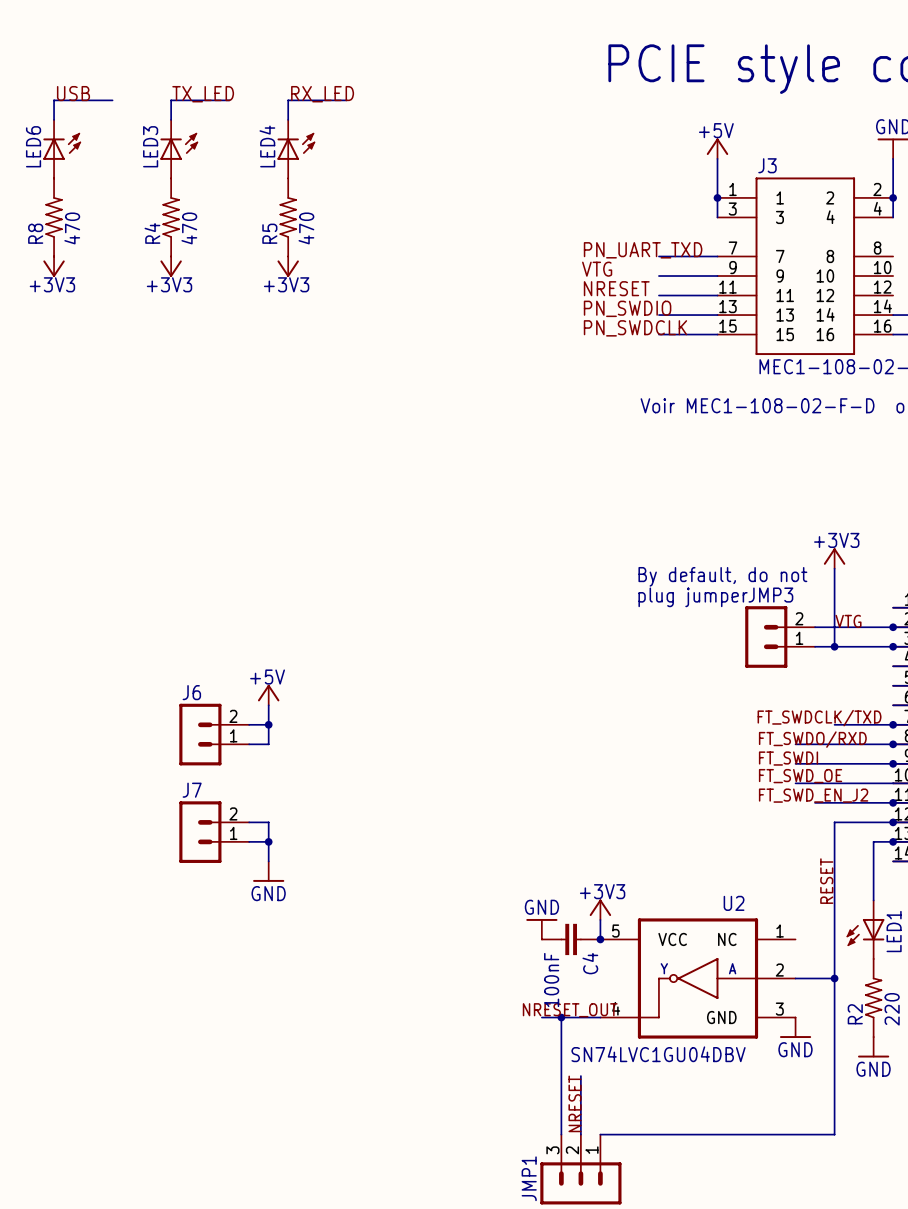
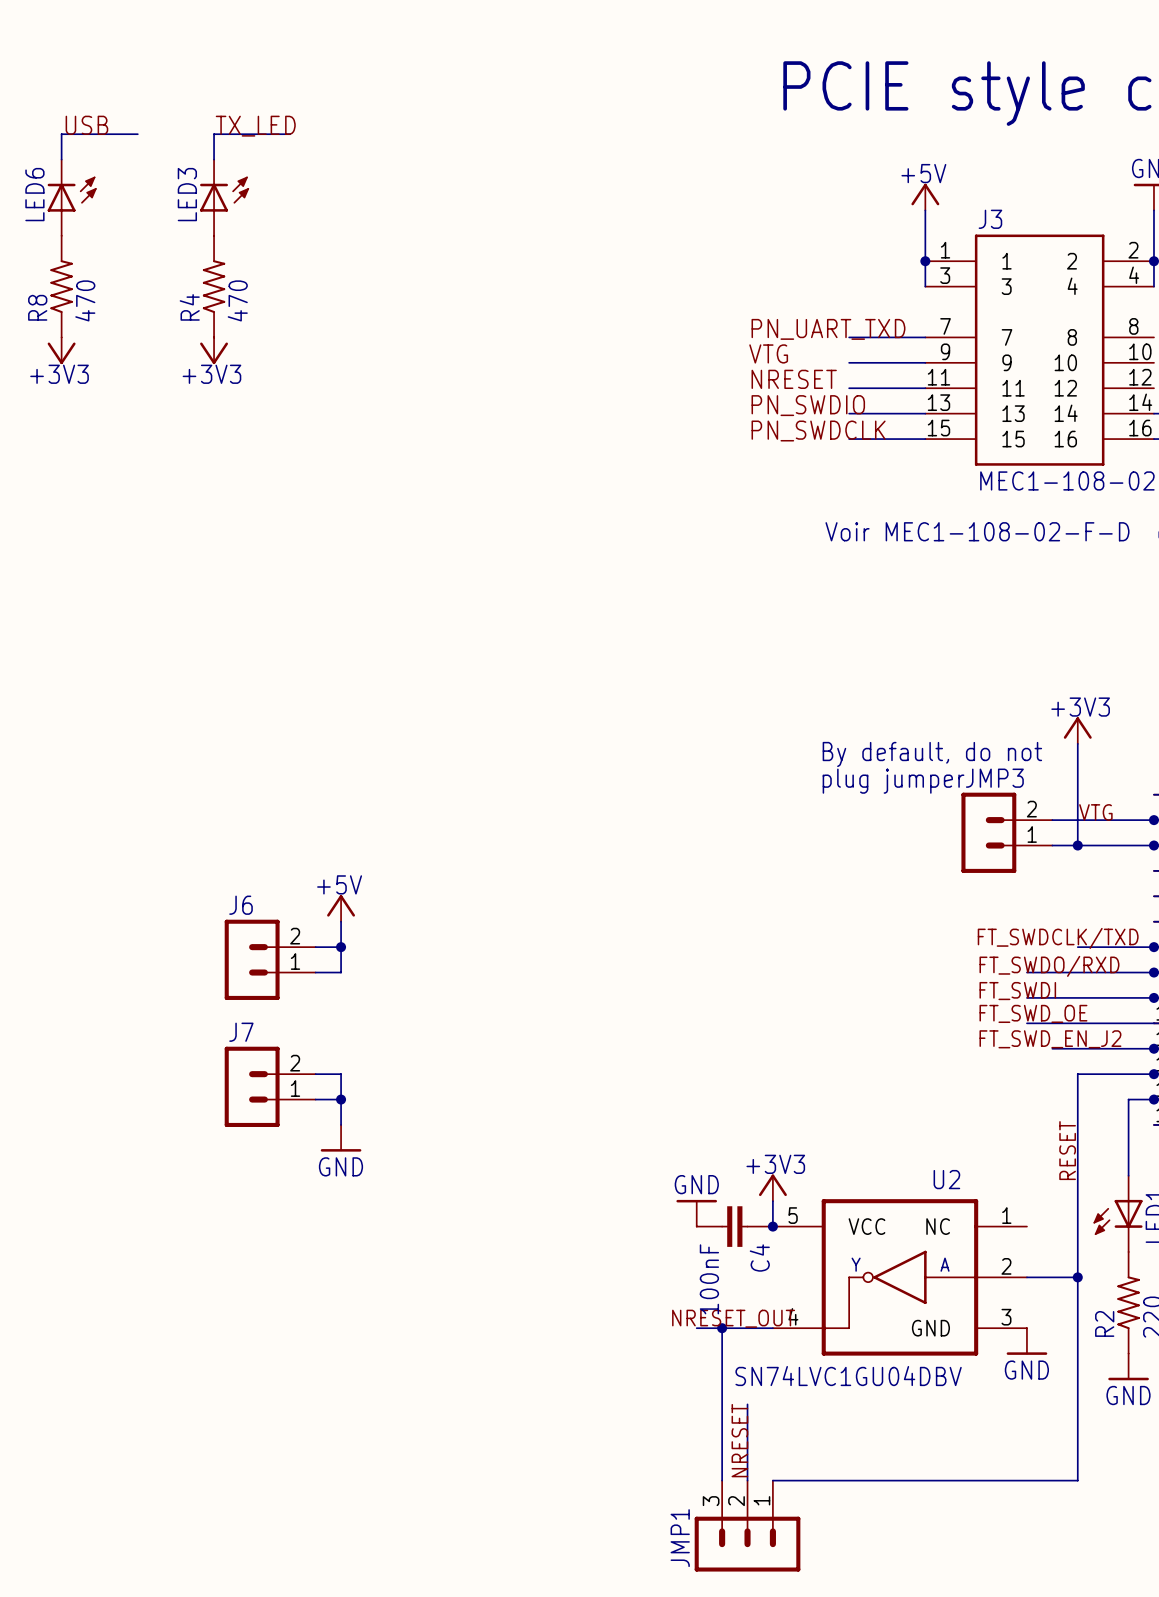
label: RX_LED (322, 94) -> none
wire: (346, 100) (288, 100) (288, 119) -> none
LED4: (296, 149) -> none
R5: 470 (288, 217) -> none
power symbol: +3V3 (288, 266) -> none

